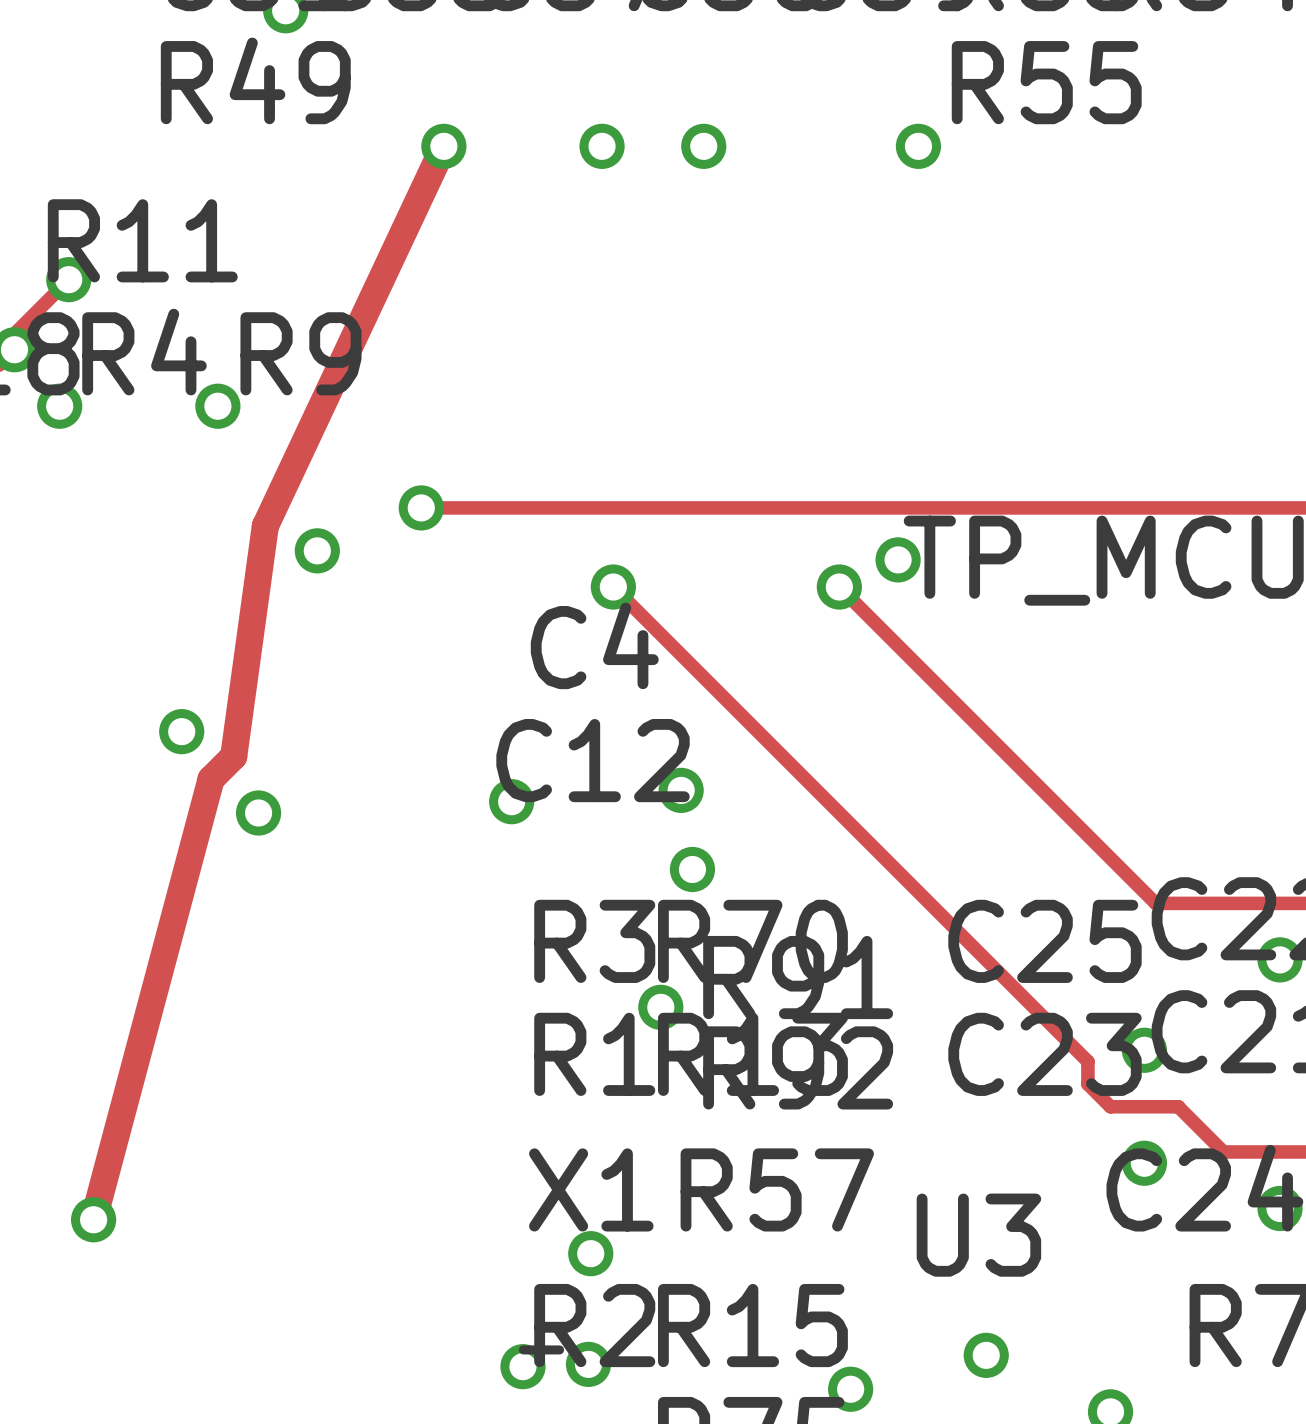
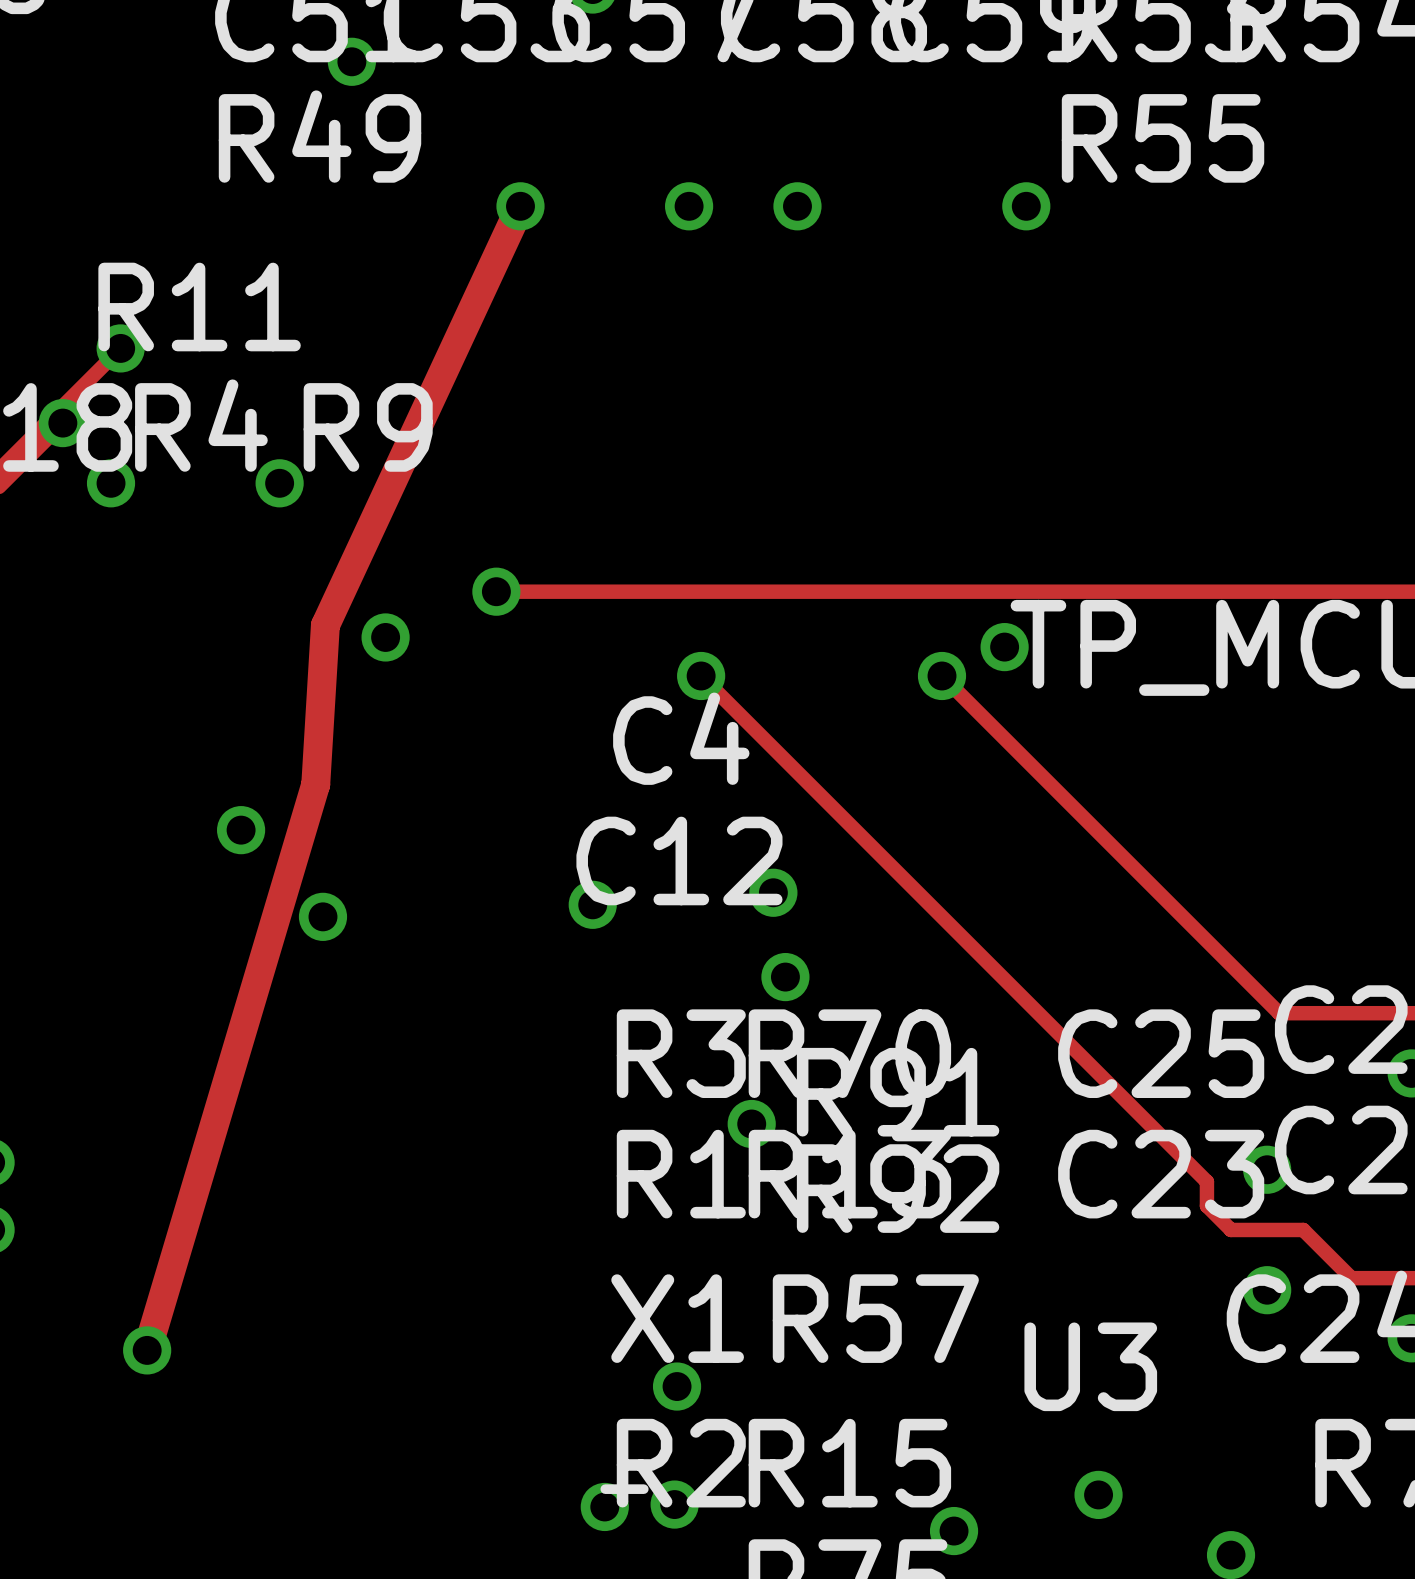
track: (443, 146) (265, 526) (233, 756) (211, 779) (93, 1219) -> (520, 206) (325, 625) (315, 784) (147, 1350)

